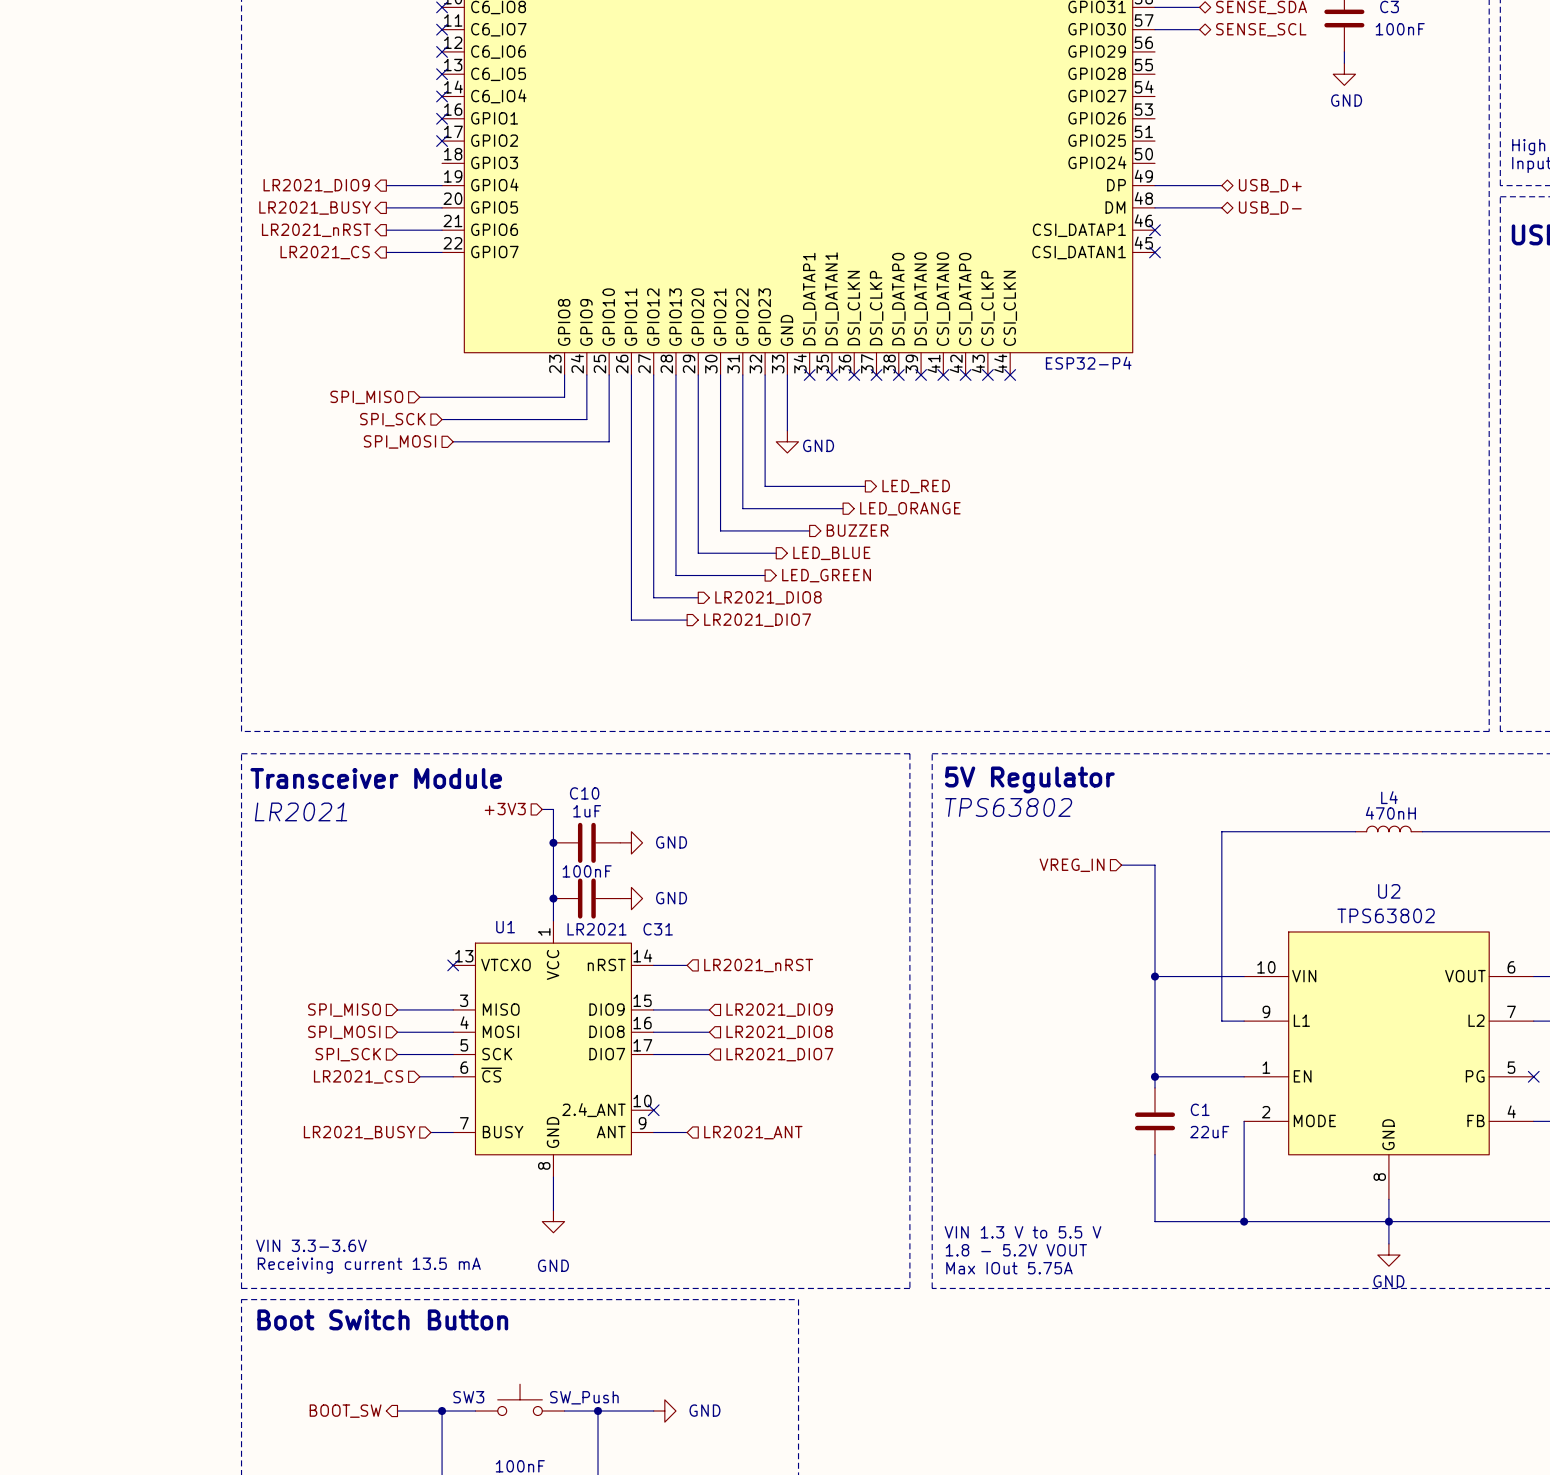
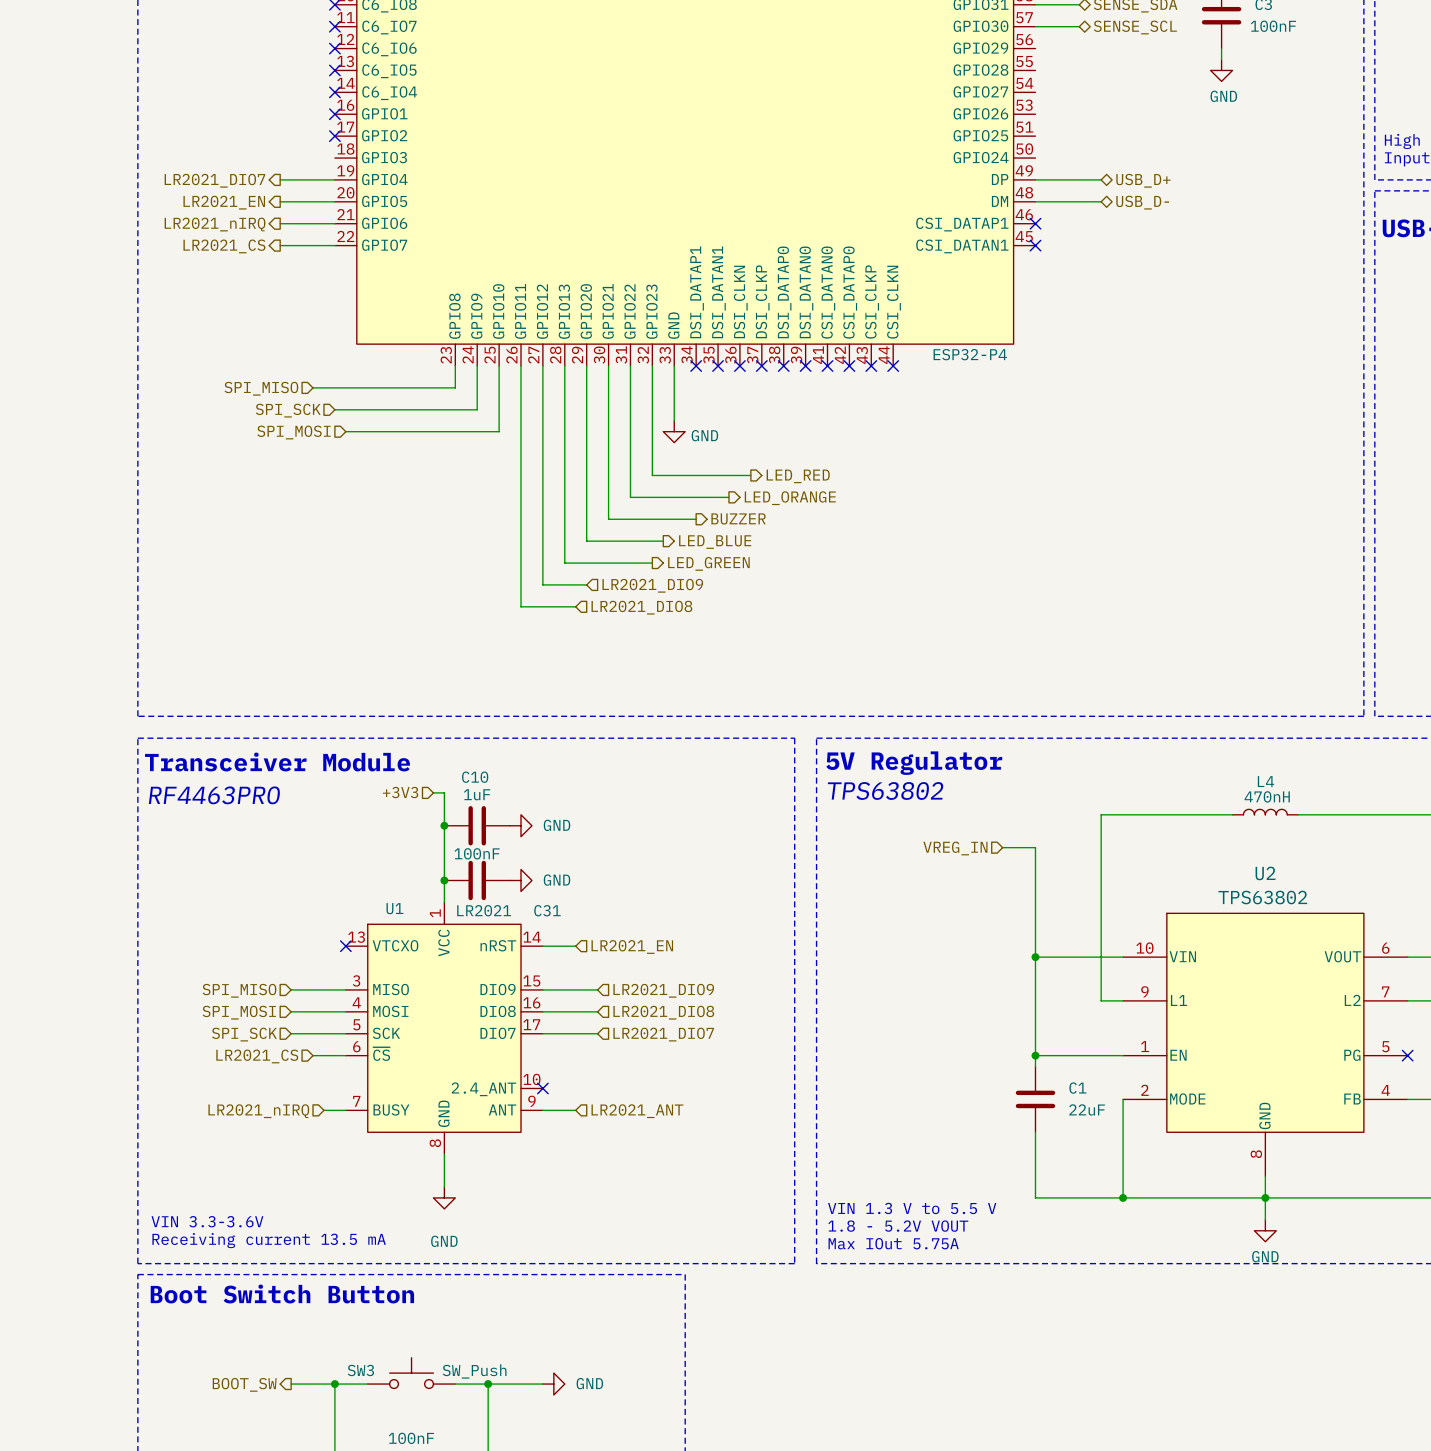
hierarchical label: LR2021_DIO9 (316, 185) -> LR2021_DIO7 (214, 180)
hierarchical label: LR2021_BUSY (315, 208) -> LR2021_EN (224, 202)
hierarchical label: LR2021_nRST (316, 230) -> LR2021_nIRQ (215, 224)
hierarchical label shape: output (768, 597) -> input (652, 585)
hierarchical label: LR2021_DIO8 (768, 597) -> LR2021_DIO9 (652, 585)
hierarchical label shape: output (757, 620) -> input (641, 607)
hierarchical label: LR2021_DIO7 (757, 620) -> LR2021_DIO8 (641, 607)
text: LR2021 (301, 811) -> RF4463PRO (214, 795)
hierarchical label: LR2021_nRST (758, 965) -> LR2021_EN (632, 947)
hierarchical label: LR2021_BUSY (359, 1132) -> LR2021_nIRQ (258, 1111)

